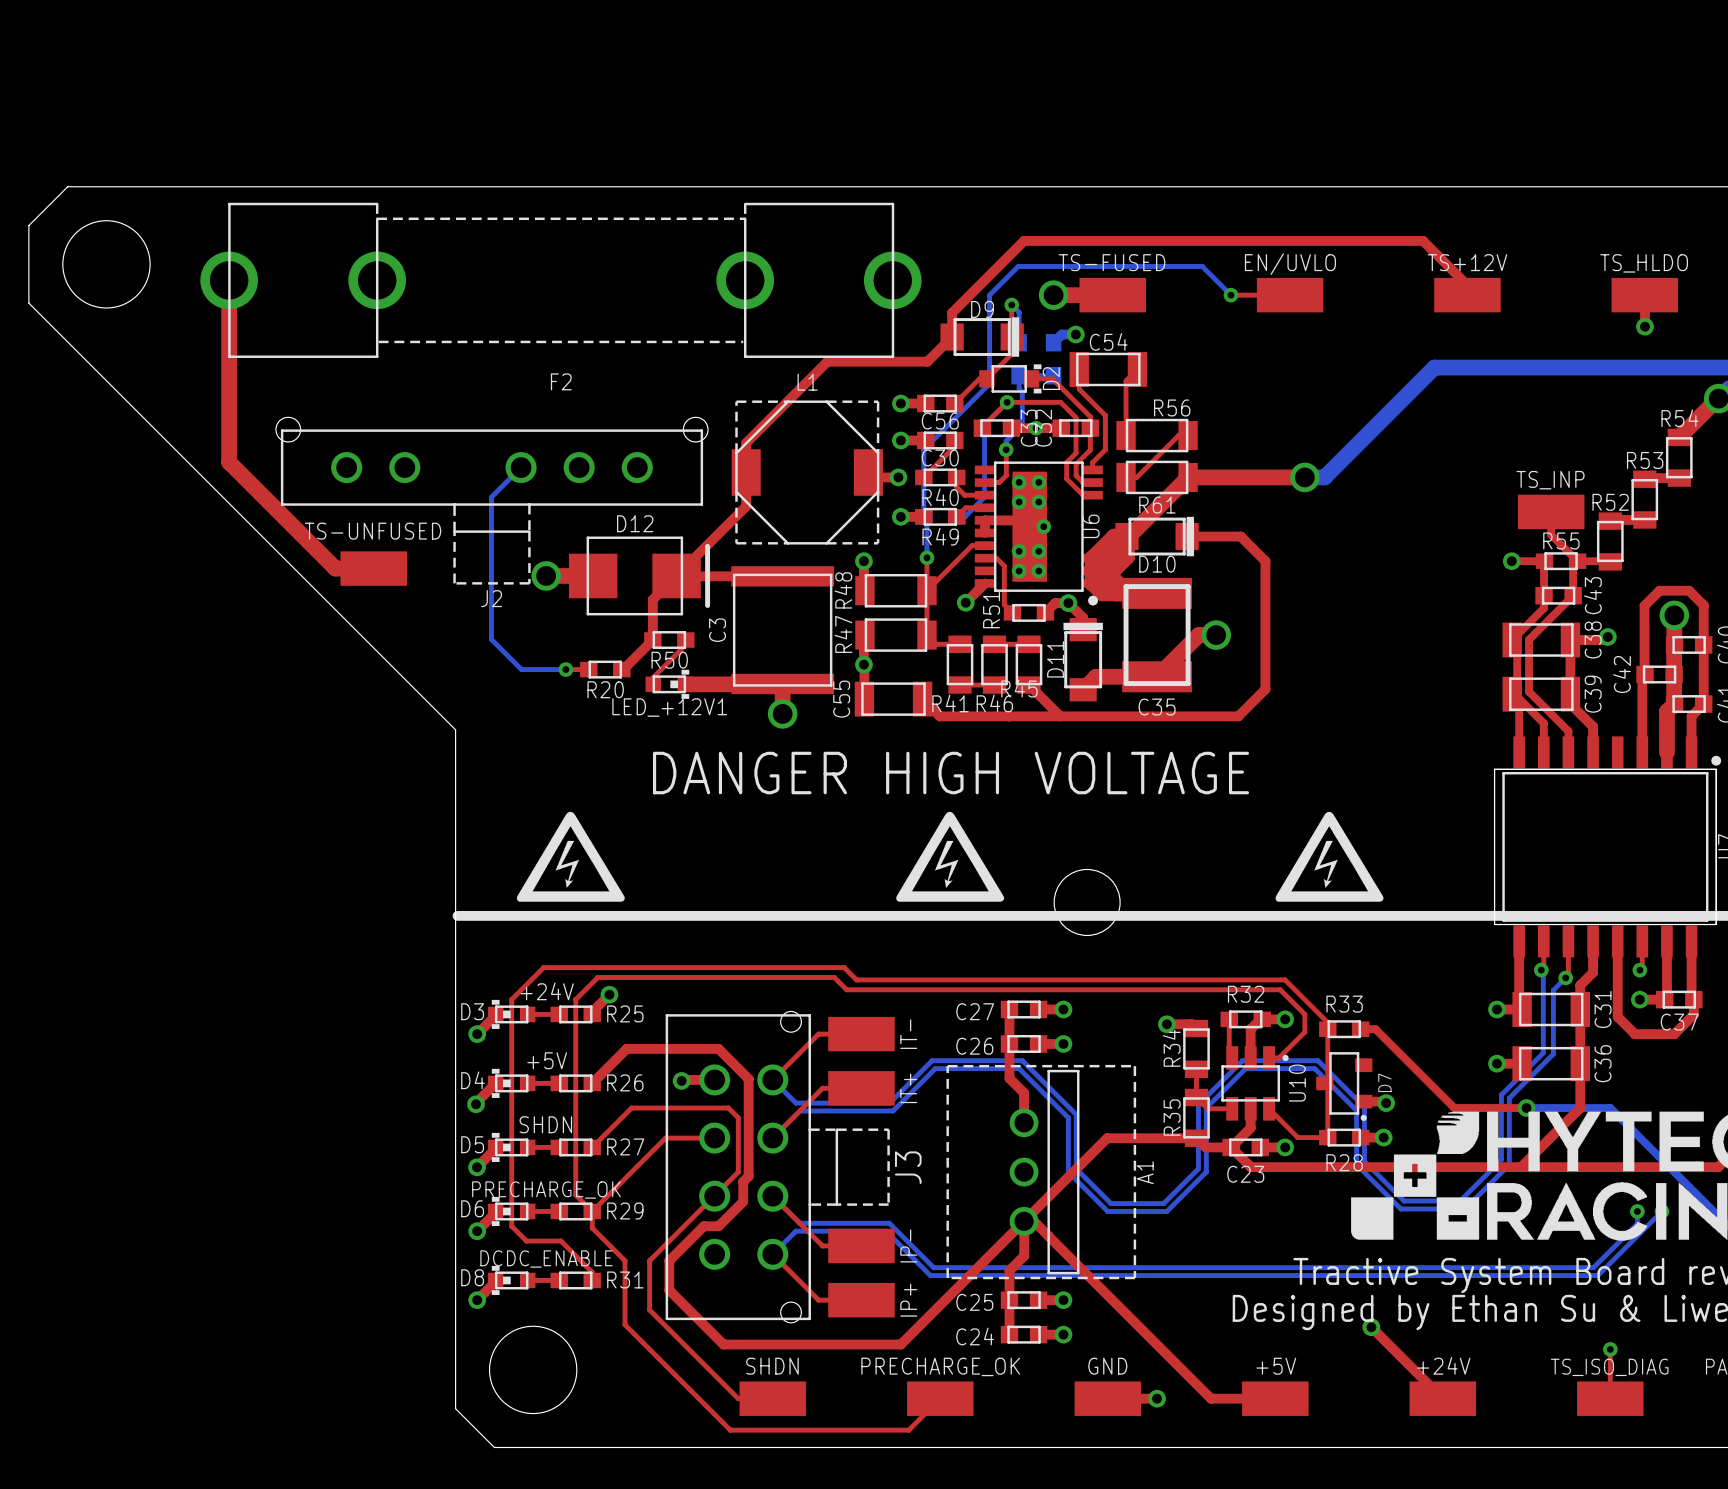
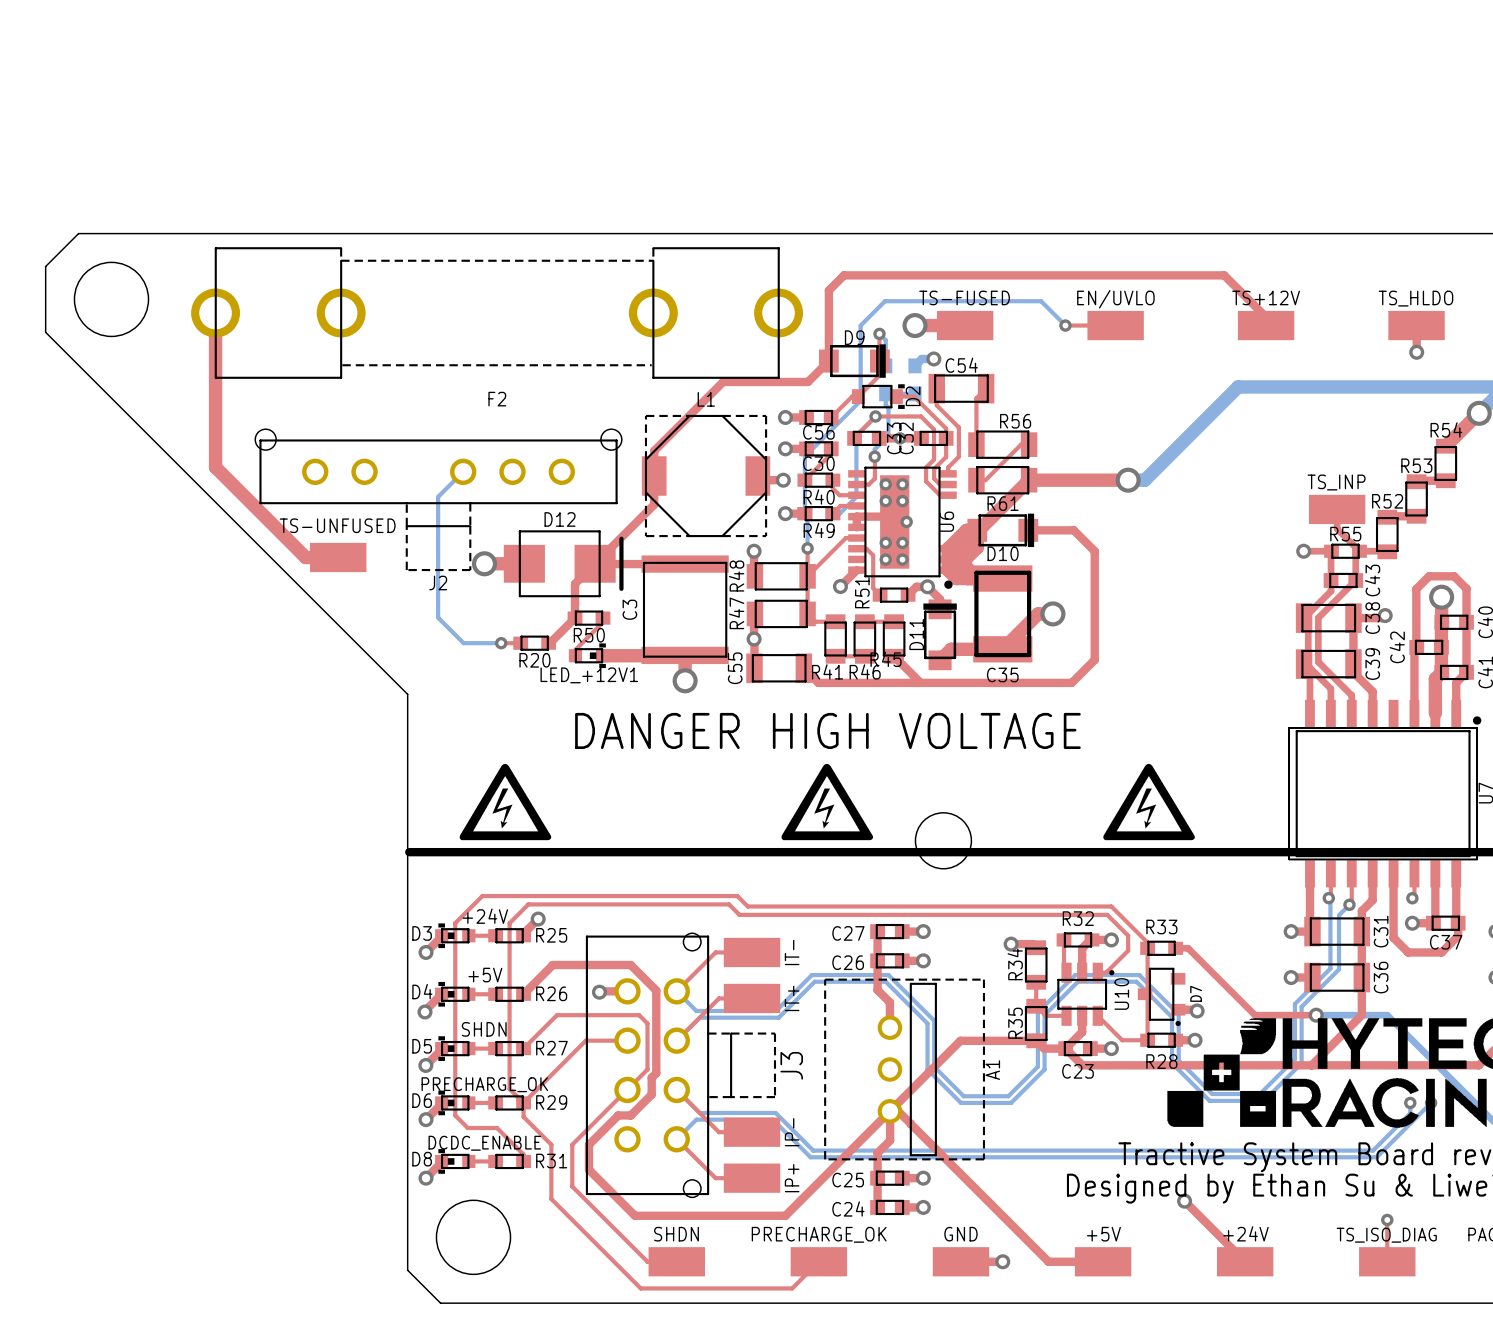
top track: (1423, 240) (1024, 240) (952, 312) -> (1228, 279) (1224, 275) (843, 275) (828, 290) (828, 340)

